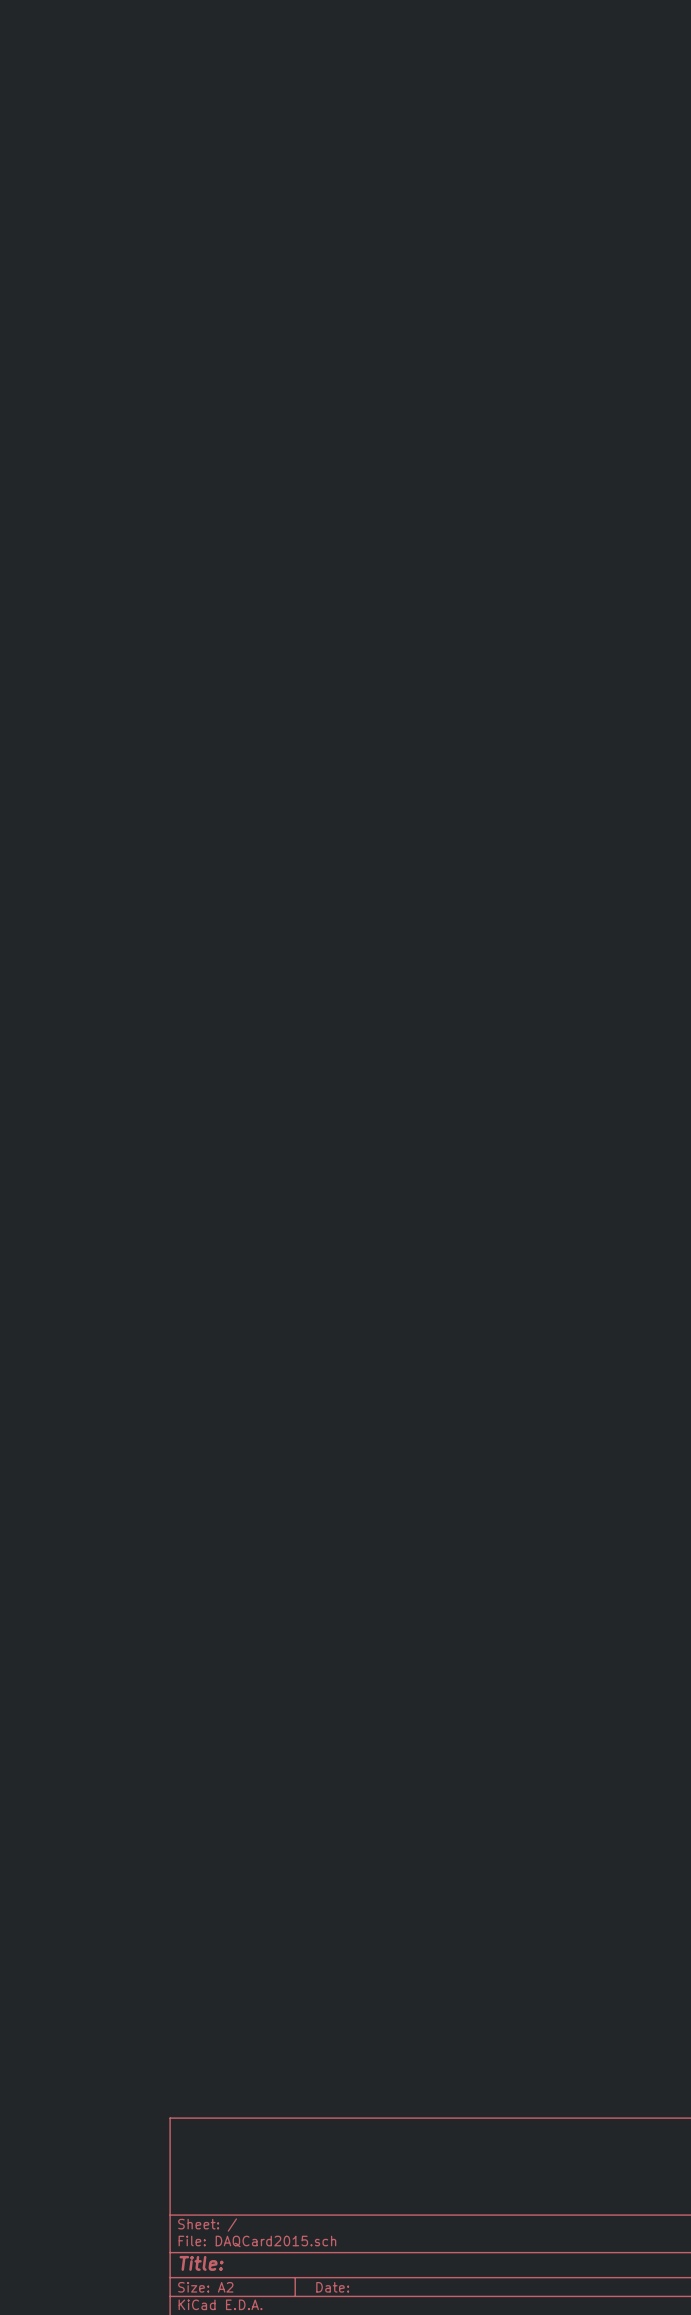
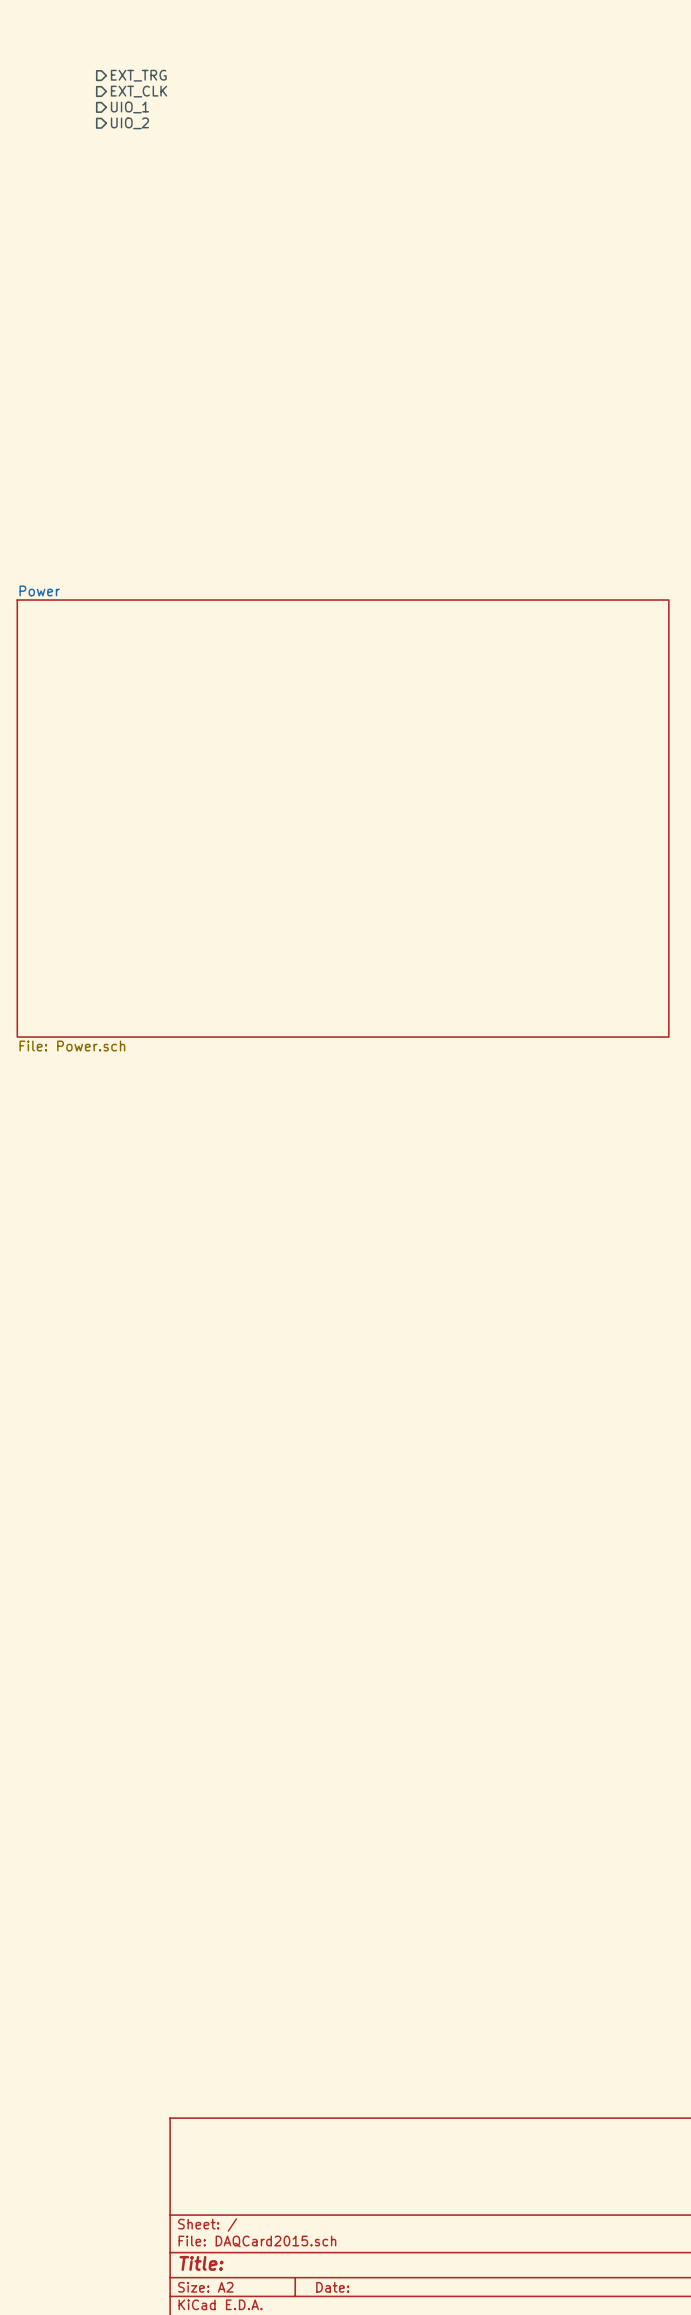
sheet pin: none -> EXT_TRG (138, 75)
sheet pin: none -> EXT_CLK (139, 91)
sheet pin: none -> UIO_1 (129, 107)
sheet pin: none -> UIO_2 (129, 123)
sheet Power: none -> File: Power.sch (343, 818)

